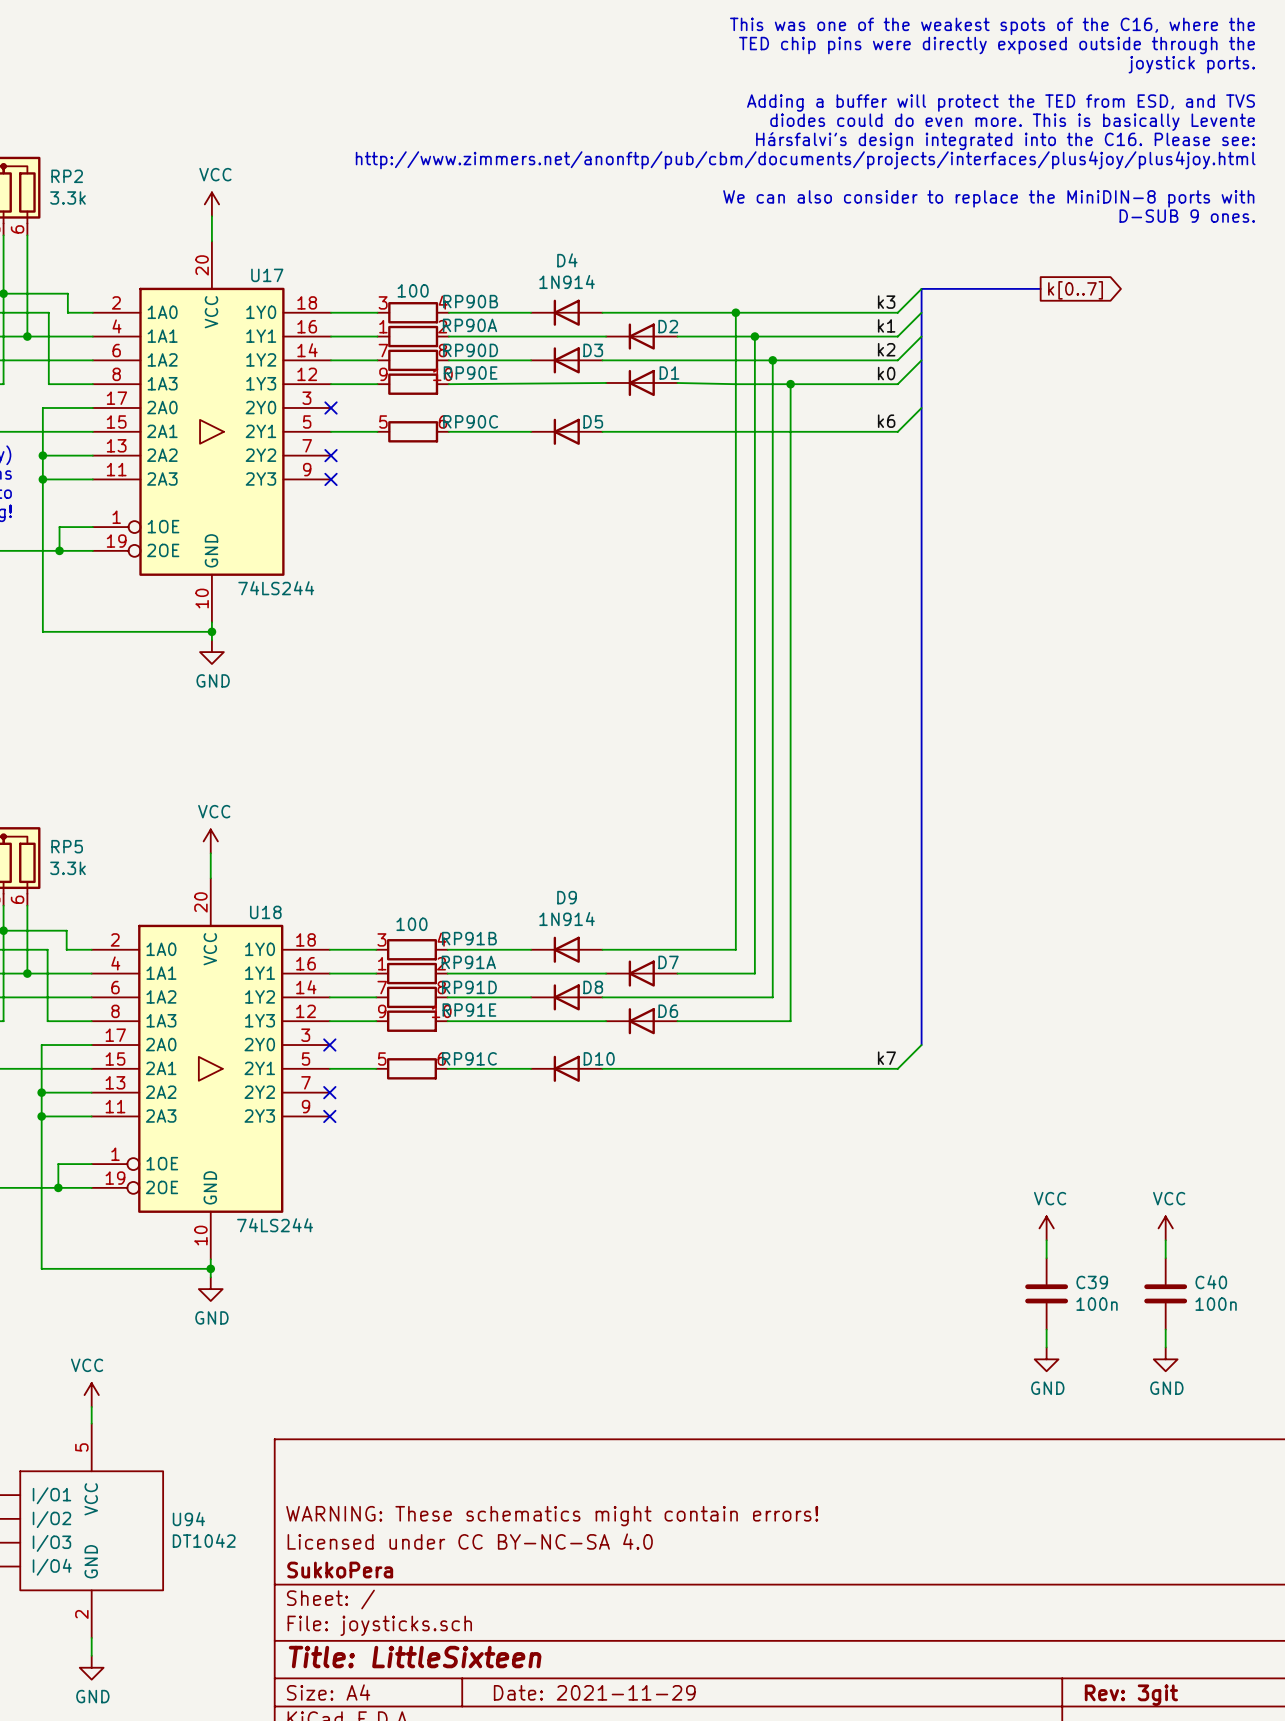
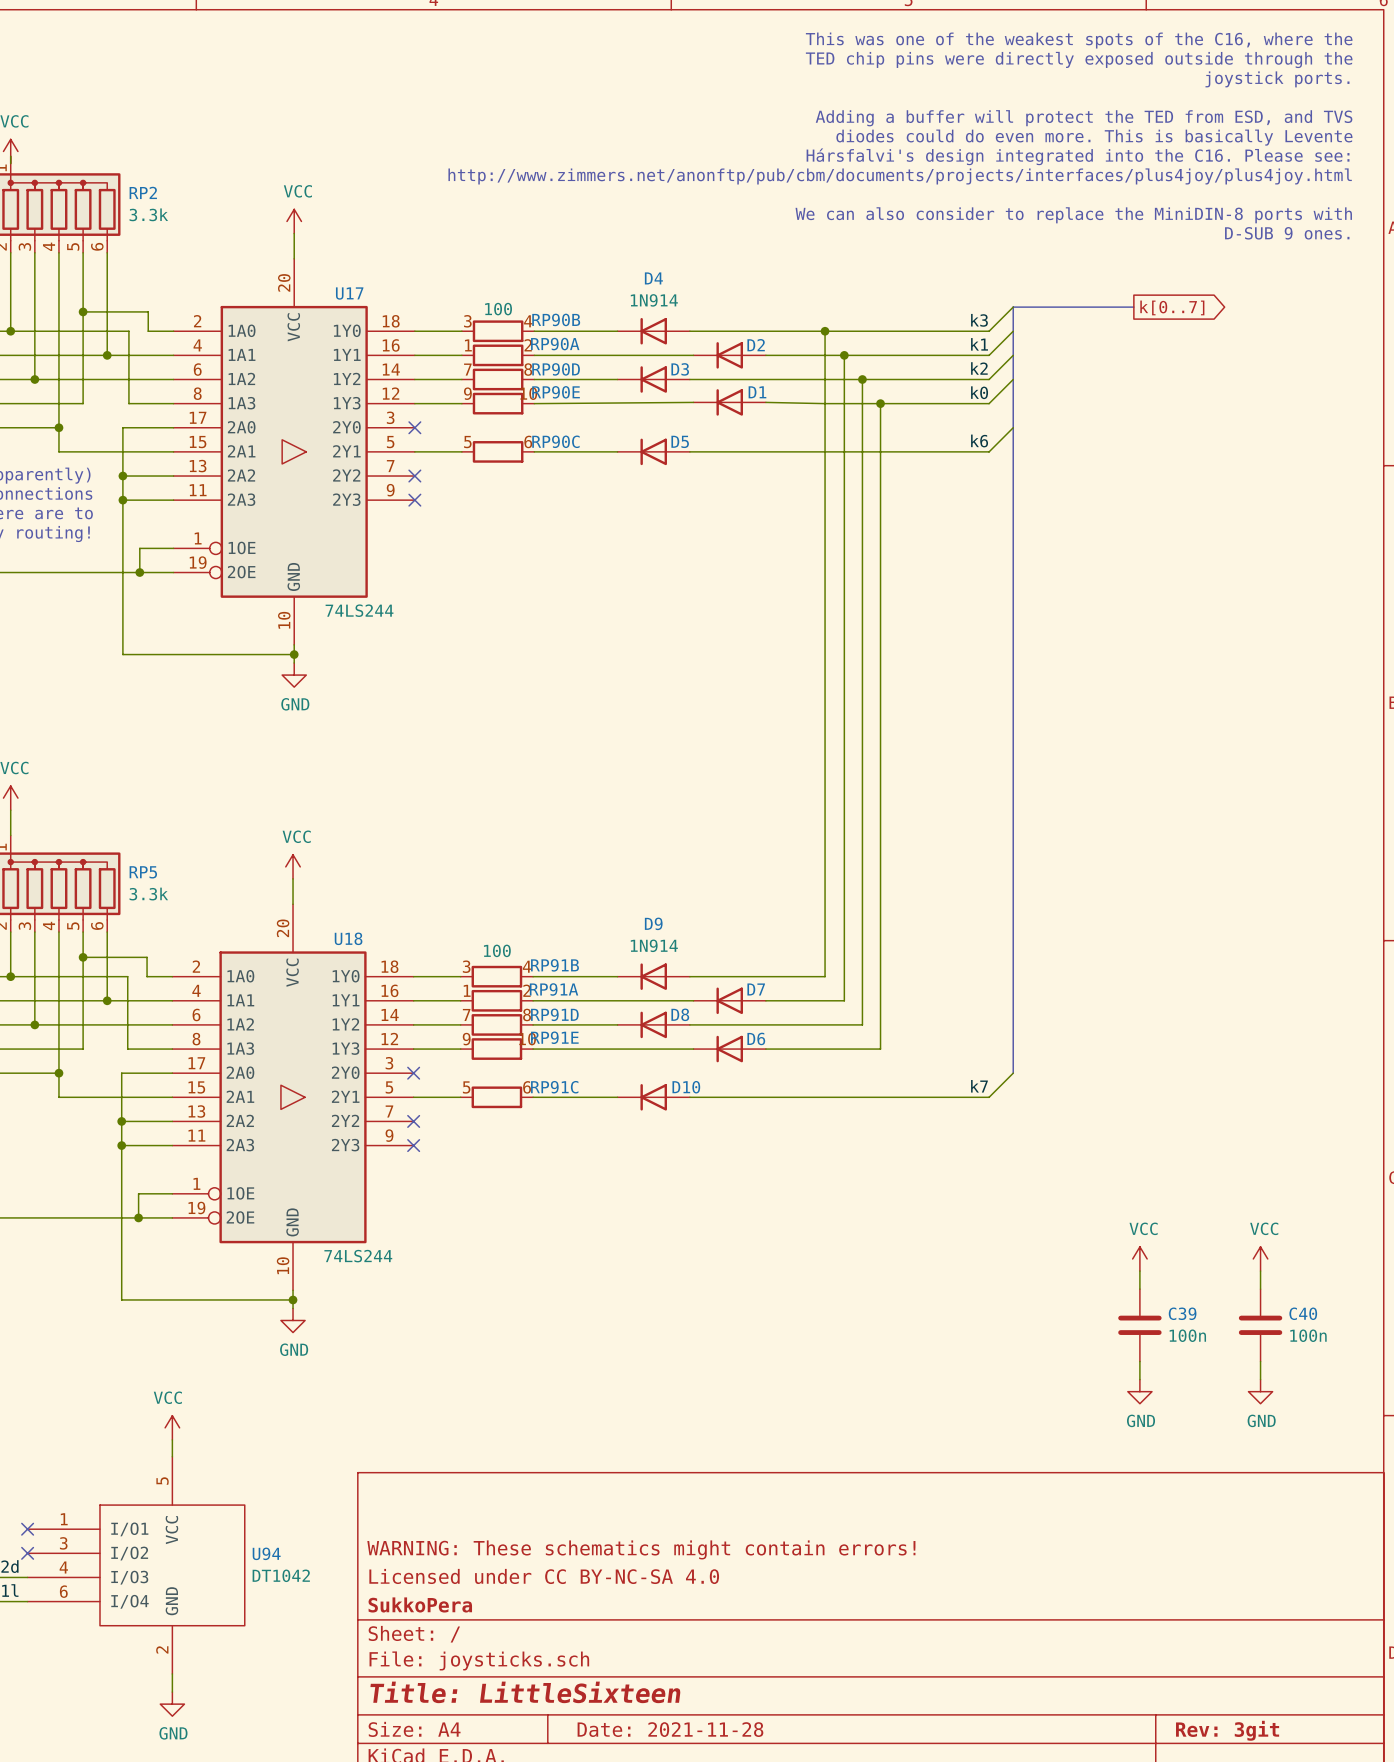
title block: Date: 2021-11-29 (594, 1692) -> Date: 2021-11-28 (670, 1729)

